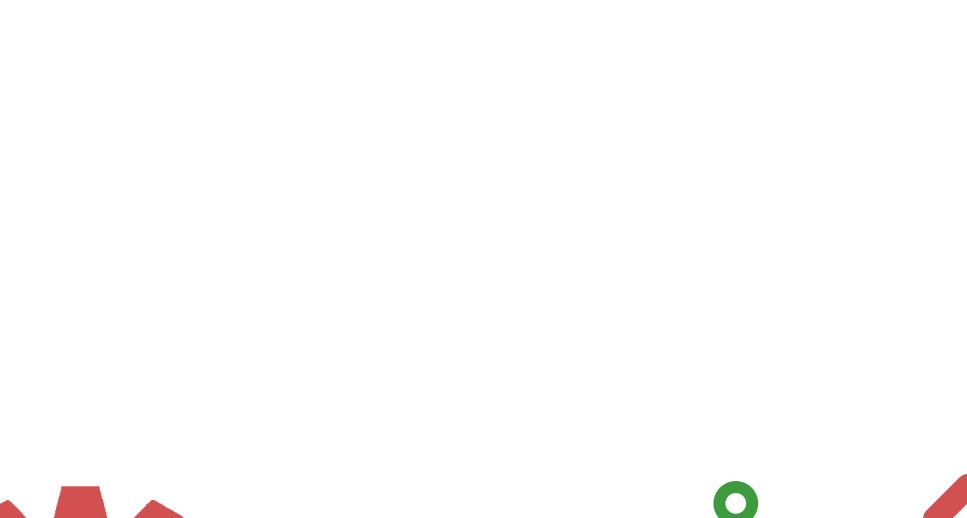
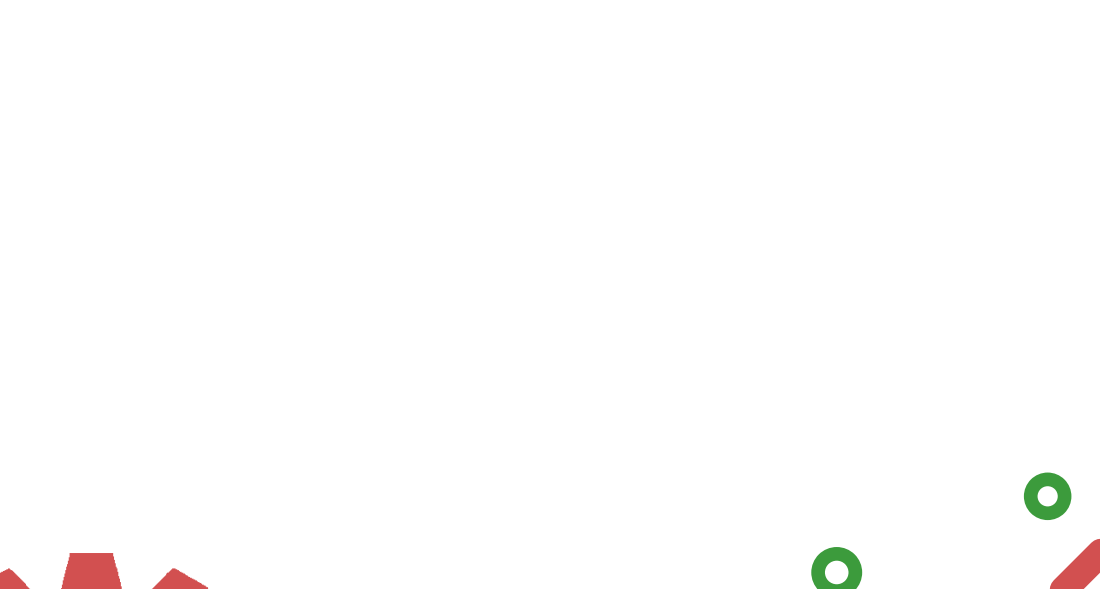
via: none -> (1047, 496)

